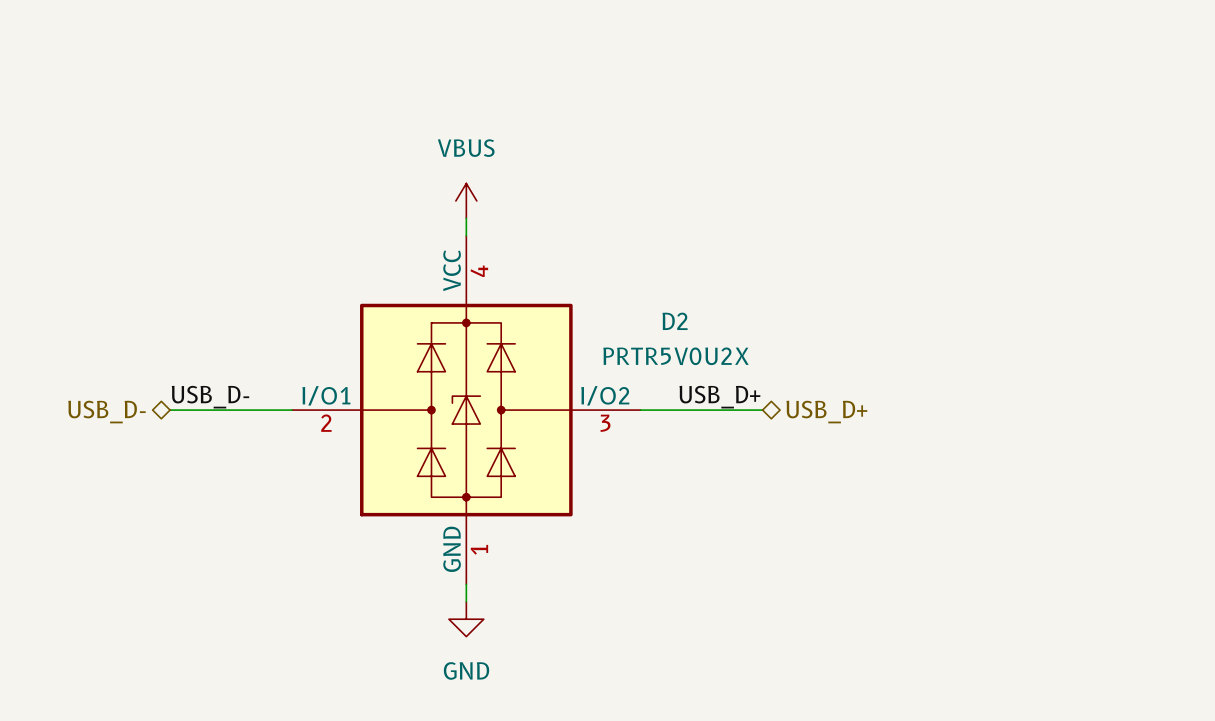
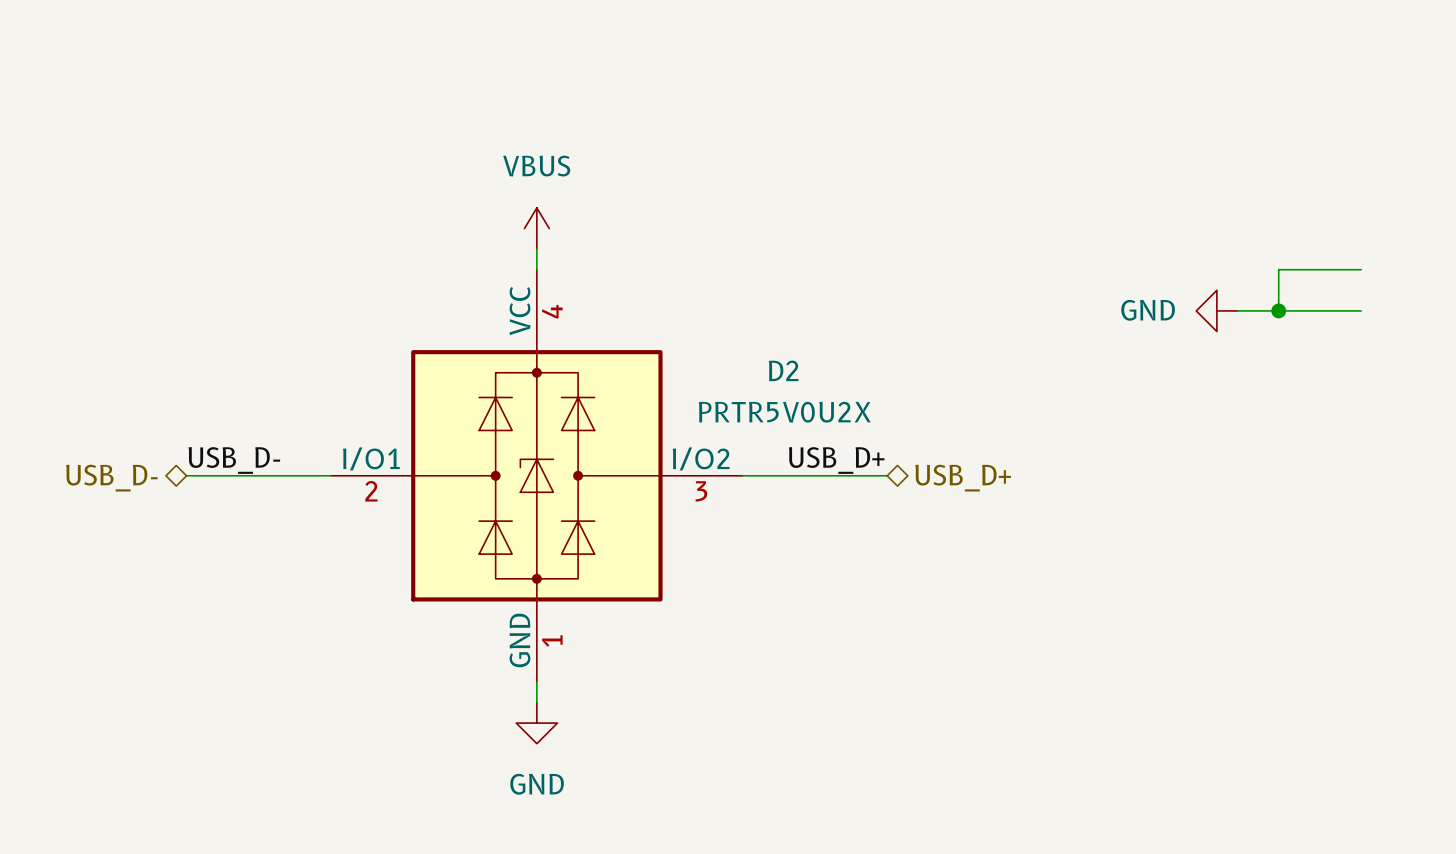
wire: none -> (1361, 269) (1278, 269) (1278, 310)
power symbol: none -> GND (1216, 310)
wire: none -> (1237, 310) (1361, 310)
junction: none -> (1278, 310)

